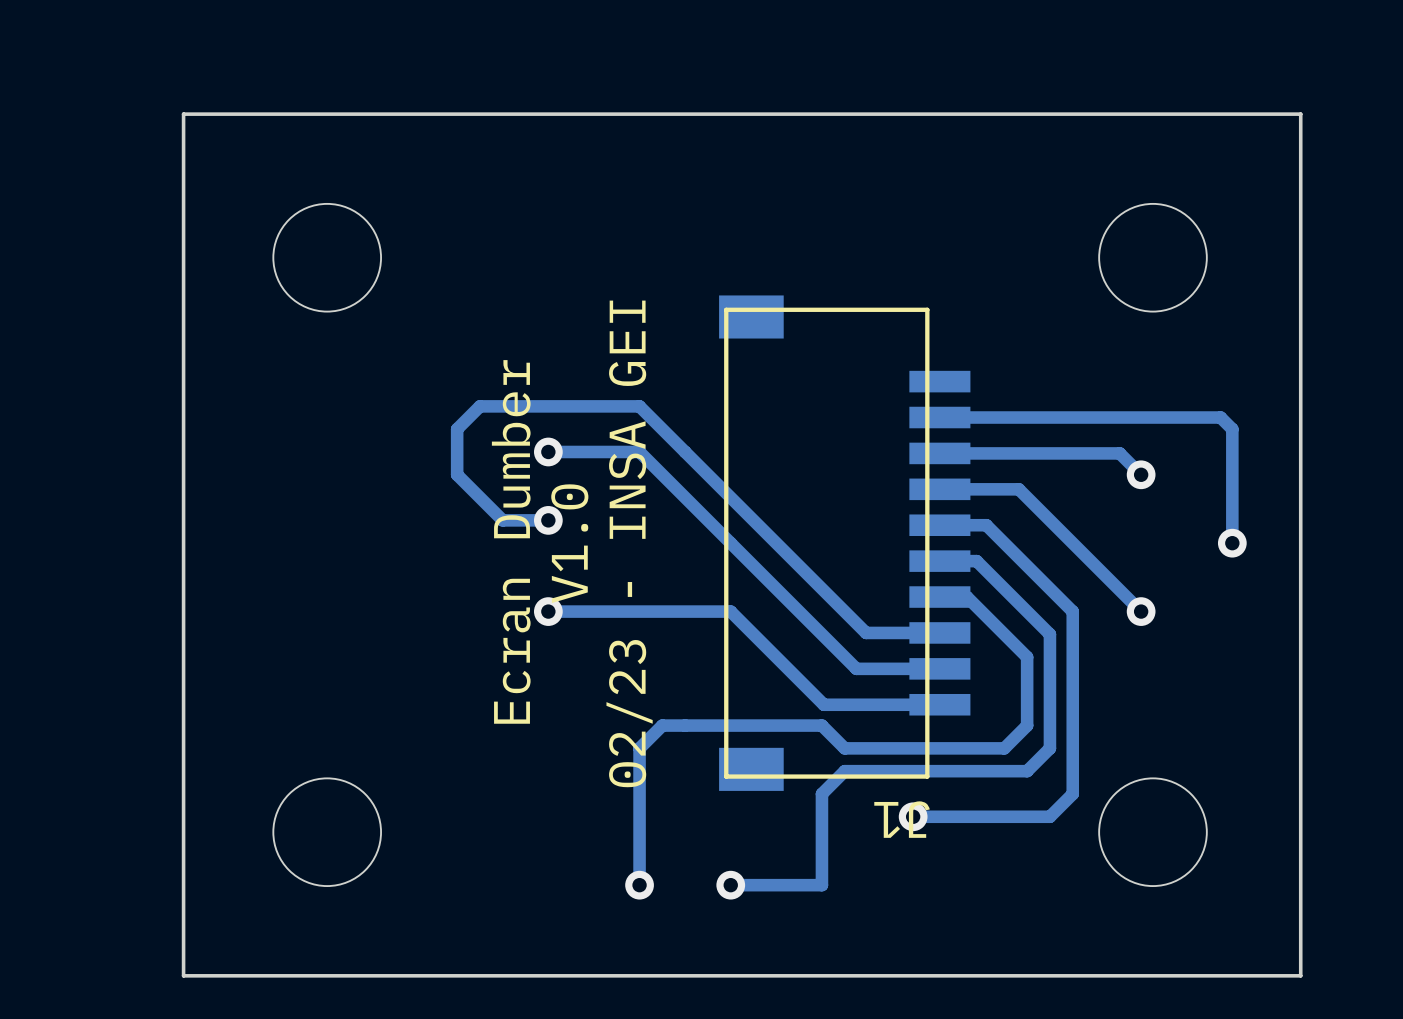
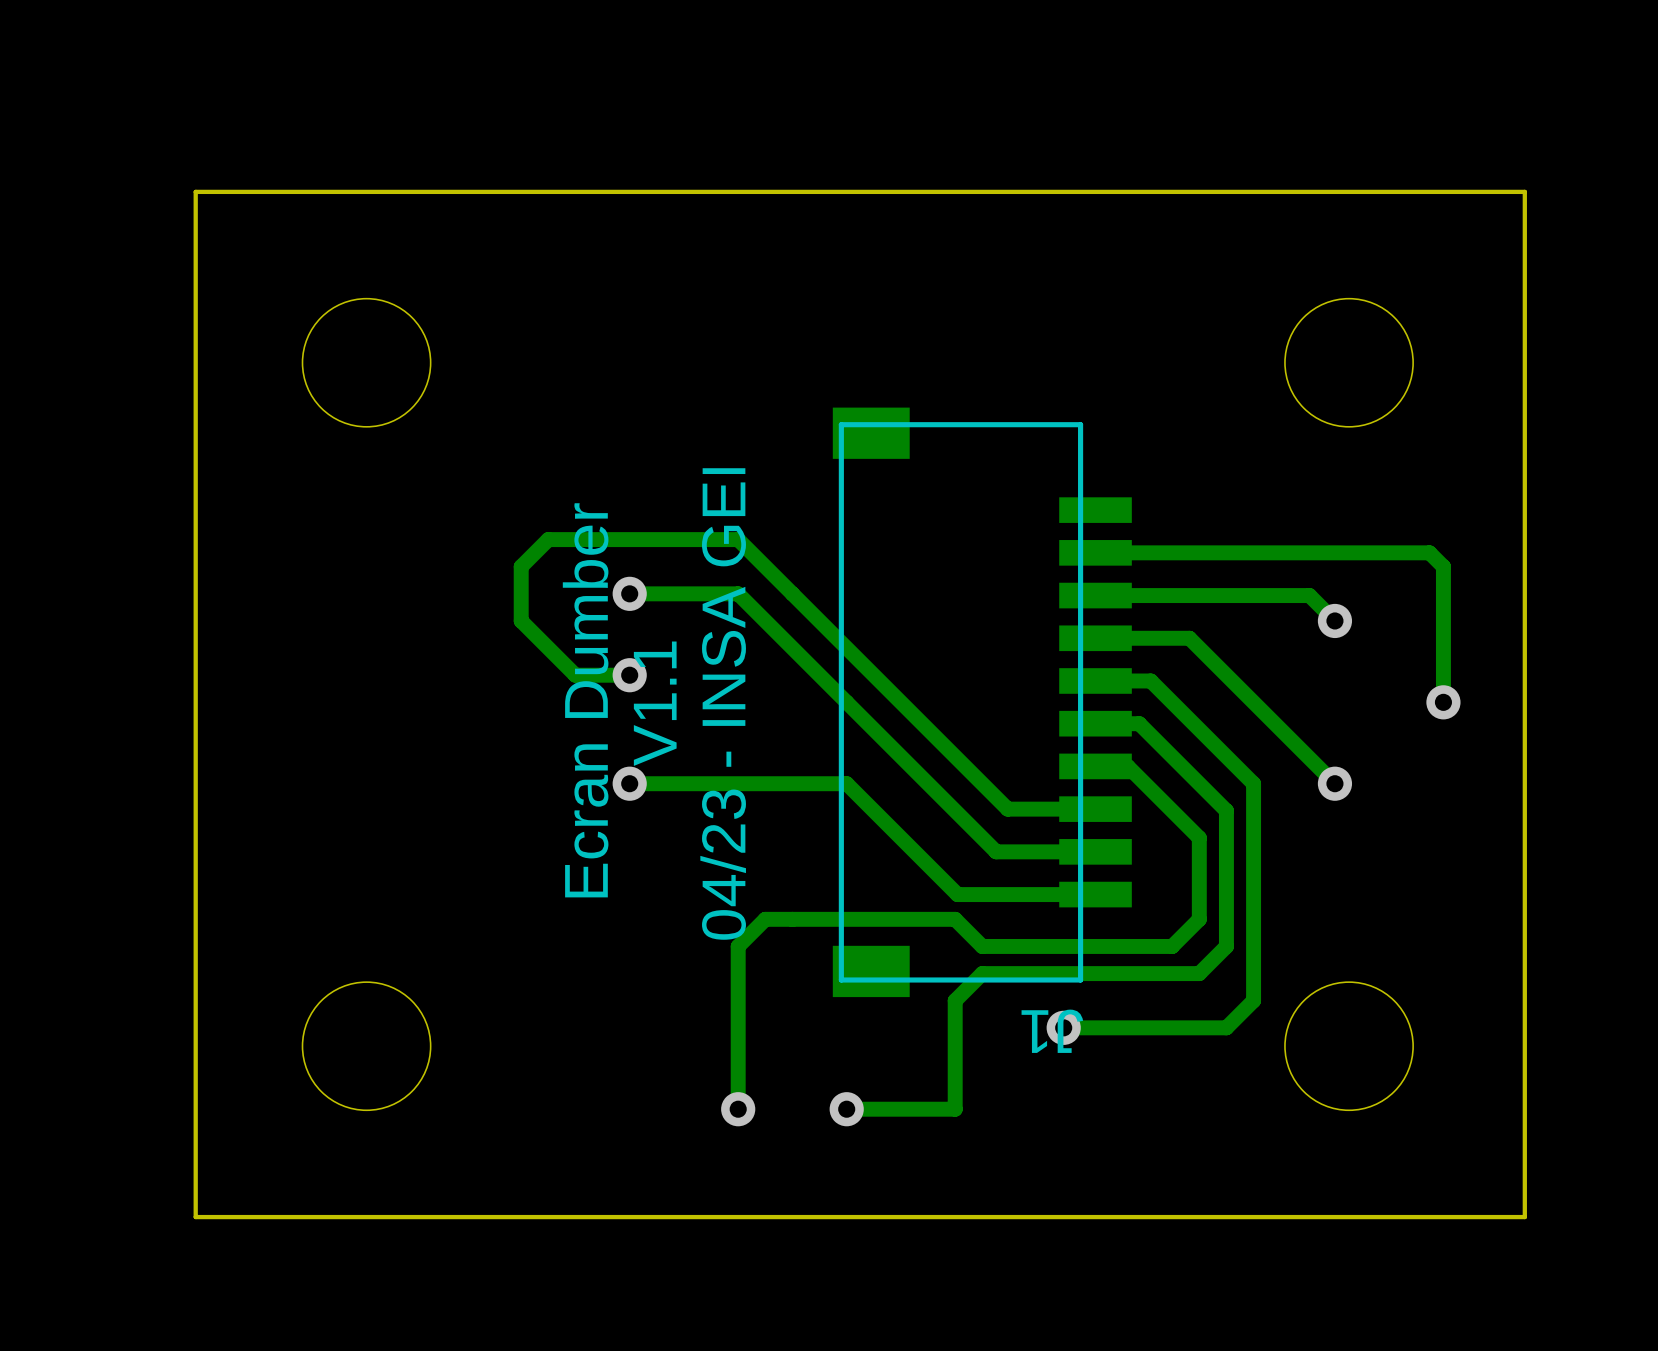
text: V1.0 (569, 543) -> V1.1 (655, 703)
text: 02/23 - INSA GEI (629, 543) -> 04/23 - INSA GEI (723, 703)

